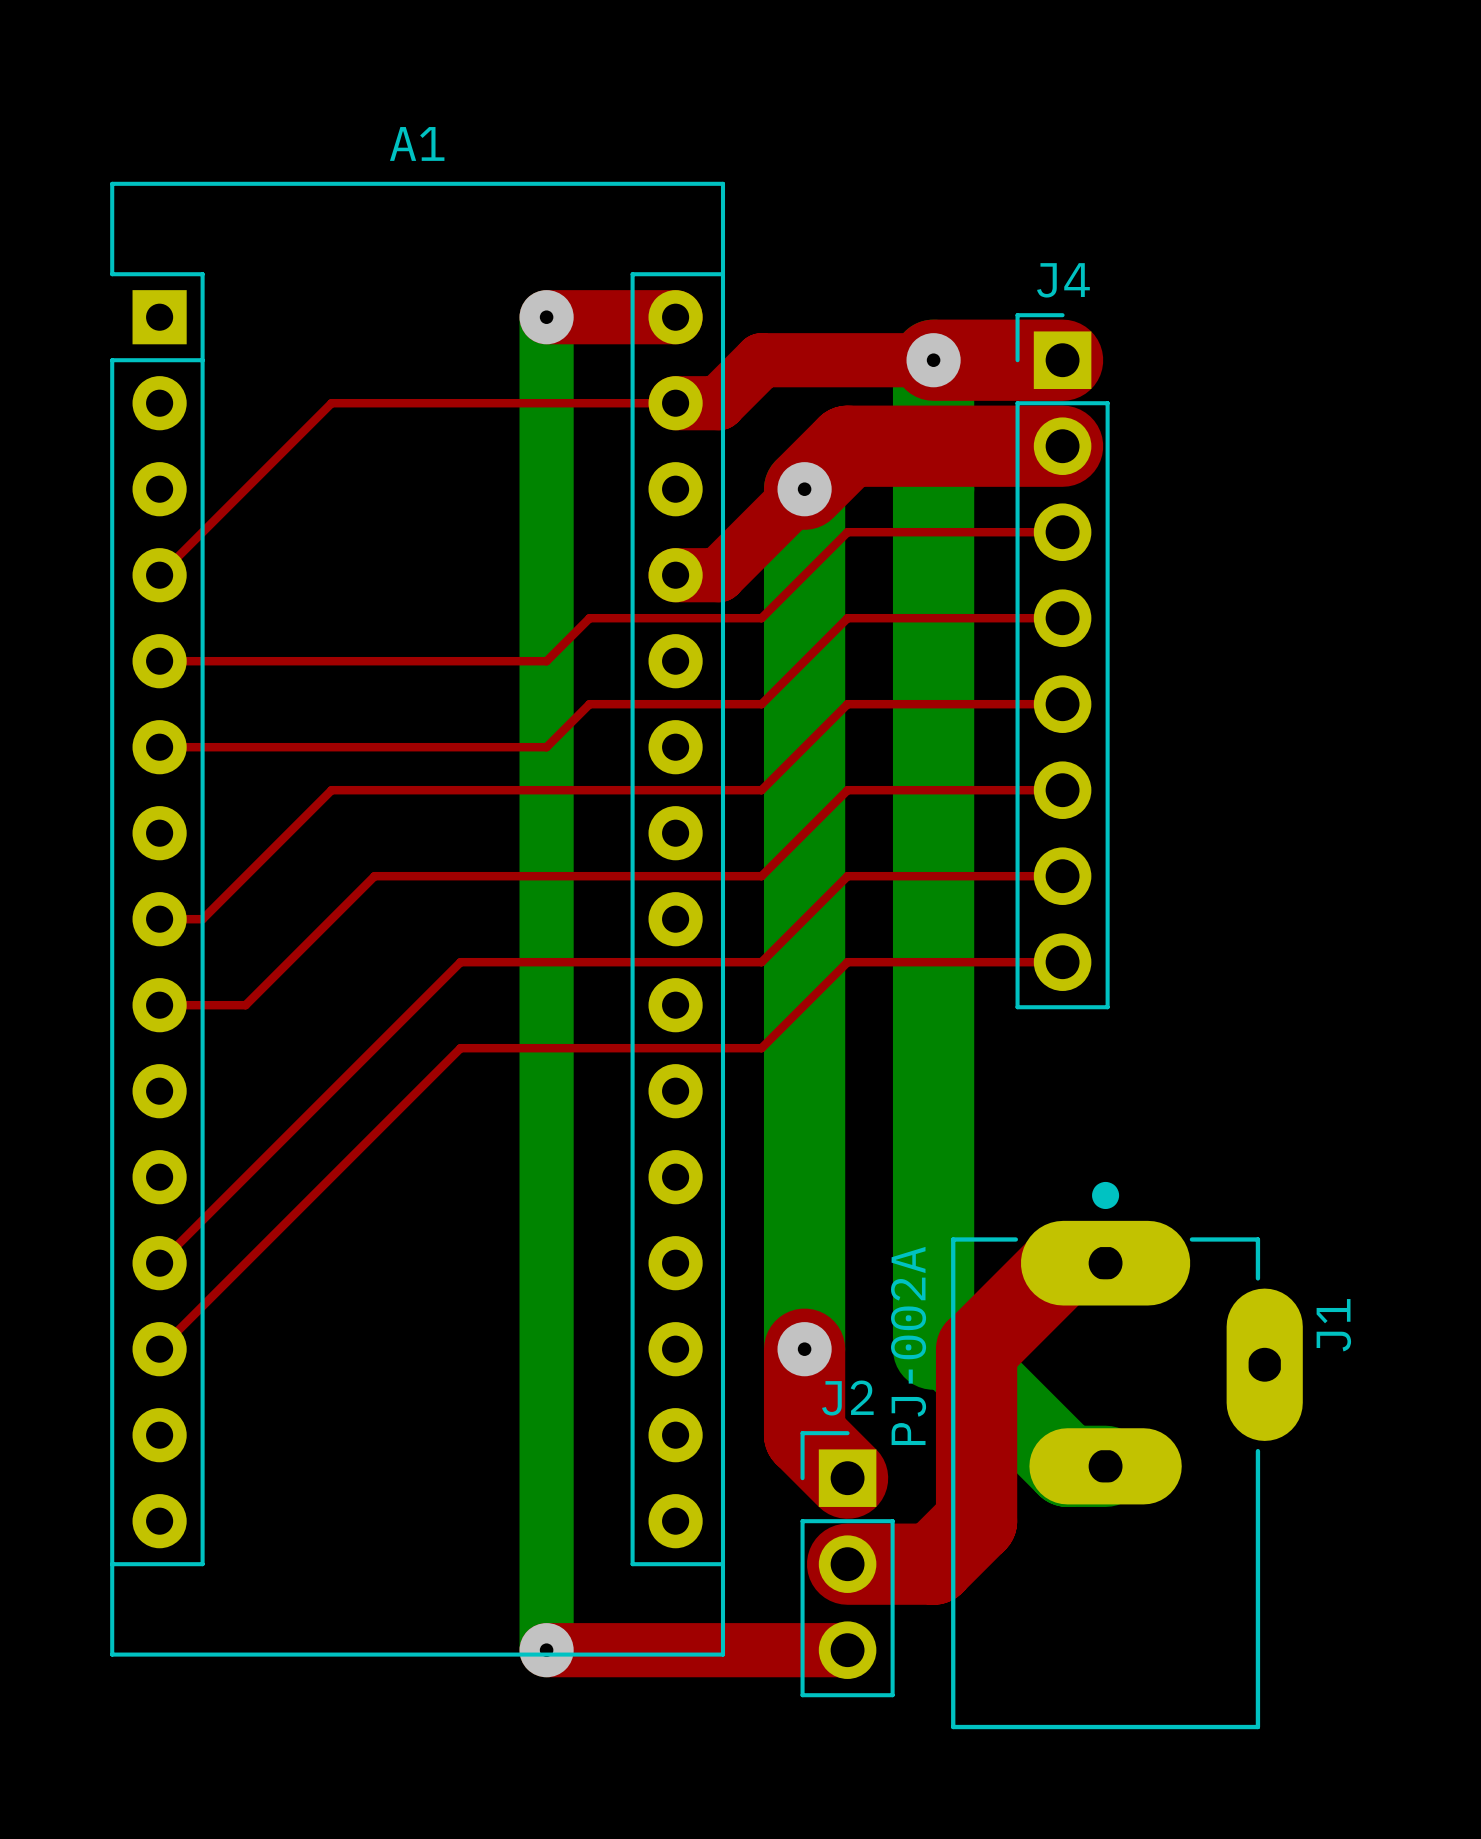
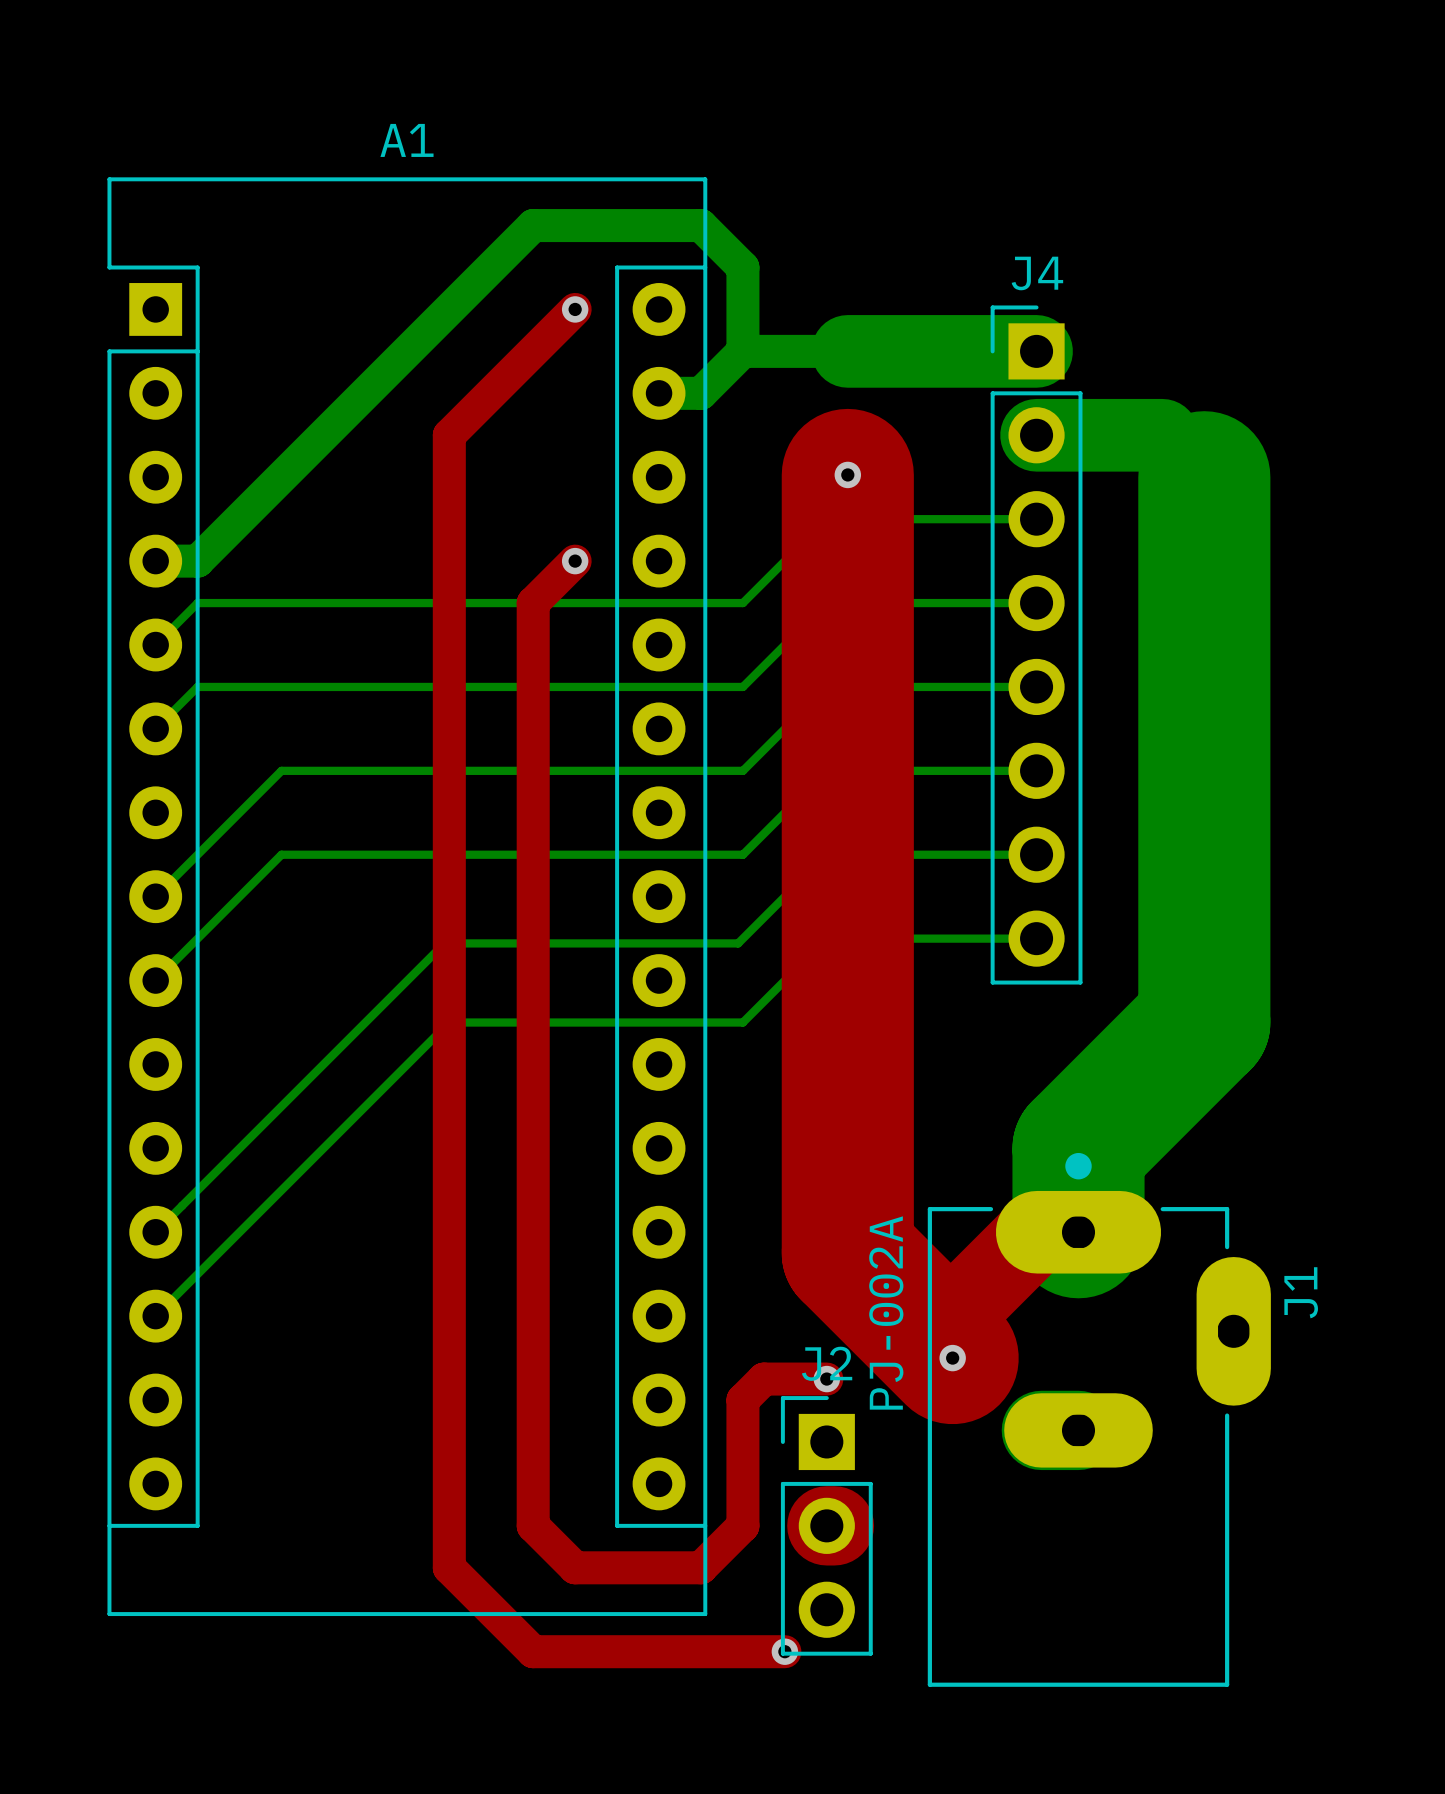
top track: (546, 317) (675, 317) -> none
bottom track: (546, 317) (546, 1650) -> none
via: (546, 317) -> none
top track: none -> (575, 309) (449, 435) (449, 1567) (533, 1651) (784, 1651)
via: none -> (575, 309)
bottom track: none -> (742, 351) (742, 267) (700, 225) (533, 225) (197, 561) (155, 561)
bottom track: none -> (742, 351) (700, 393) (659, 393)
bottom track: none -> (742, 351) (1036, 351)
bottom track: (933, 360) (933, 1349) (950, 1349) (1067, 1466) -> none
via: (933, 360) -> none
top track: (1062, 360) (761, 360) (718, 403) (331, 403) (159, 575) -> none
top track: (1062, 446) (847, 446) (718, 575) (675, 575) -> none
bottom track: none -> (1036, 435) (1162, 435)
top track: none -> (847, 474) (847, 1253) (952, 1358)
via: none -> (847, 474)
bottom track: (804, 489) (804, 1349) -> none
via: (804, 489) -> none
bottom track: none -> (1204, 477) (1204, 1022) (1078, 1148) (1078, 1281)
top track: (1062, 532) (847, 532) (761, 618) (589, 618) (546, 661) (159, 661) -> none
bottom track: none -> (1036, 519) (826, 519) (742, 603) (197, 603) (155, 645)
top track: none -> (575, 561) (533, 603) (533, 1525) (575, 1567) (700, 1567) (742, 1525) (742, 1400) (763, 1379) (826, 1379)
via: none -> (575, 561)
top track: (1062, 618) (847, 618) (761, 704) (589, 704) (546, 747) (159, 747) -> none
bottom track: none -> (1036, 603) (826, 603) (742, 686) (197, 686) (155, 728)
top track: (1062, 704) (847, 704) (761, 790) (331, 790) (202, 919) (159, 919) -> none
bottom track: none -> (1036, 686) (826, 686) (742, 770) (281, 770) (155, 896)
top track: (1062, 790) (847, 790) (761, 876) (374, 876) (245, 1005) (159, 1005) -> none
bottom track: none -> (1036, 770) (826, 770) (742, 854) (281, 854) (155, 980)
top track: (1062, 876) (847, 876) (761, 962) (460, 962) (159, 1263) -> none
bottom track: none -> (1036, 854) (826, 854) (738, 943) (444, 943) (155, 1232)
top track: (1062, 962) (847, 962) (761, 1048) (460, 1048) (159, 1349) -> none
bottom track: none -> (1036, 938) (826, 938) (742, 1022) (449, 1022) (155, 1316)
top track: (804, 1349) (804, 1435) (847, 1478) -> none
via: (804, 1349) -> none
top track: (976, 1349) (976, 1521) (933, 1564) (855, 1564) -> none
via: none -> (952, 1358)
via: none -> (826, 1379)
top track: (546, 1650) (847, 1650) -> none
via: (546, 1650) -> none
via: none -> (784, 1651)

